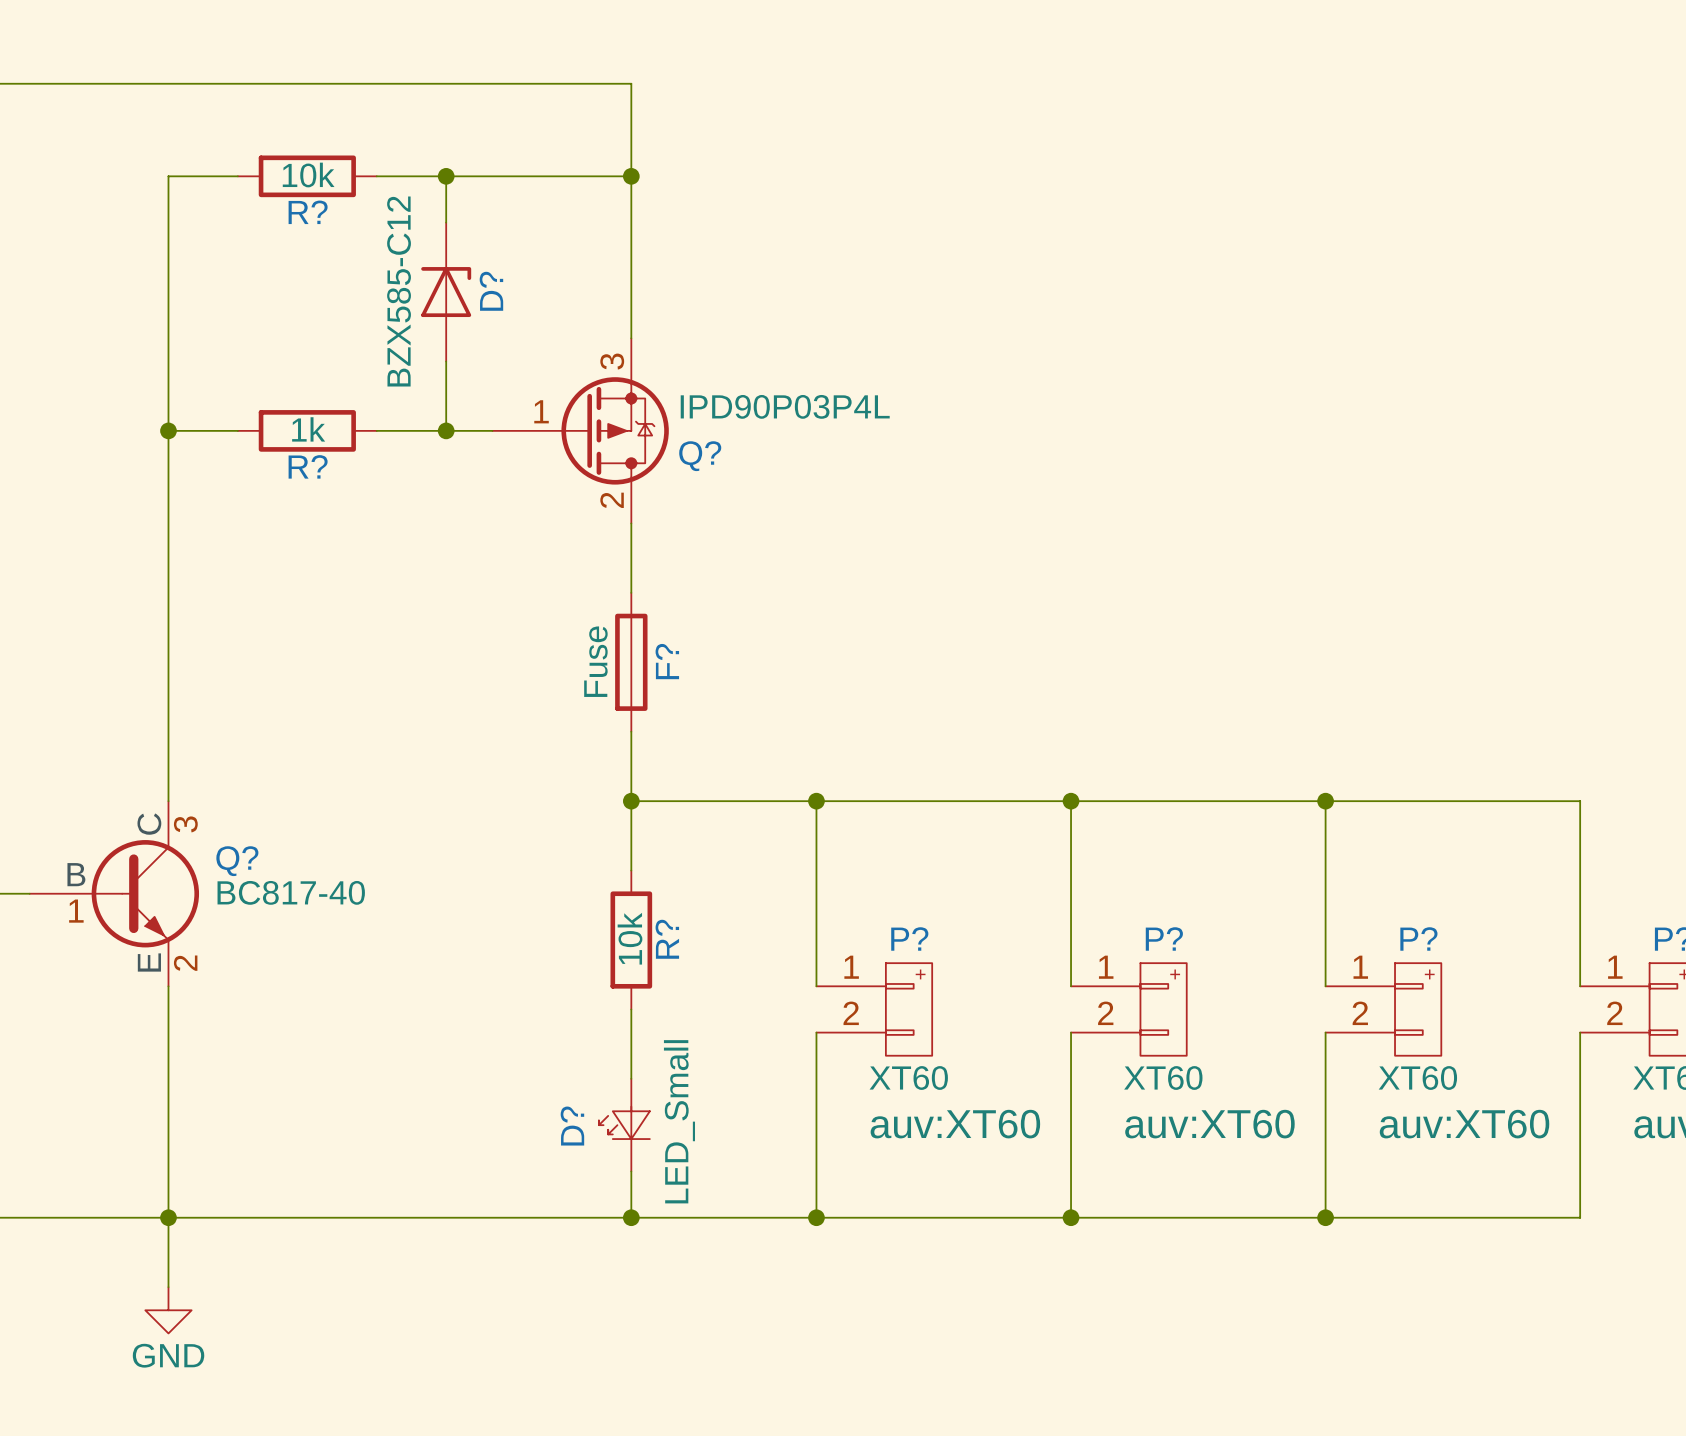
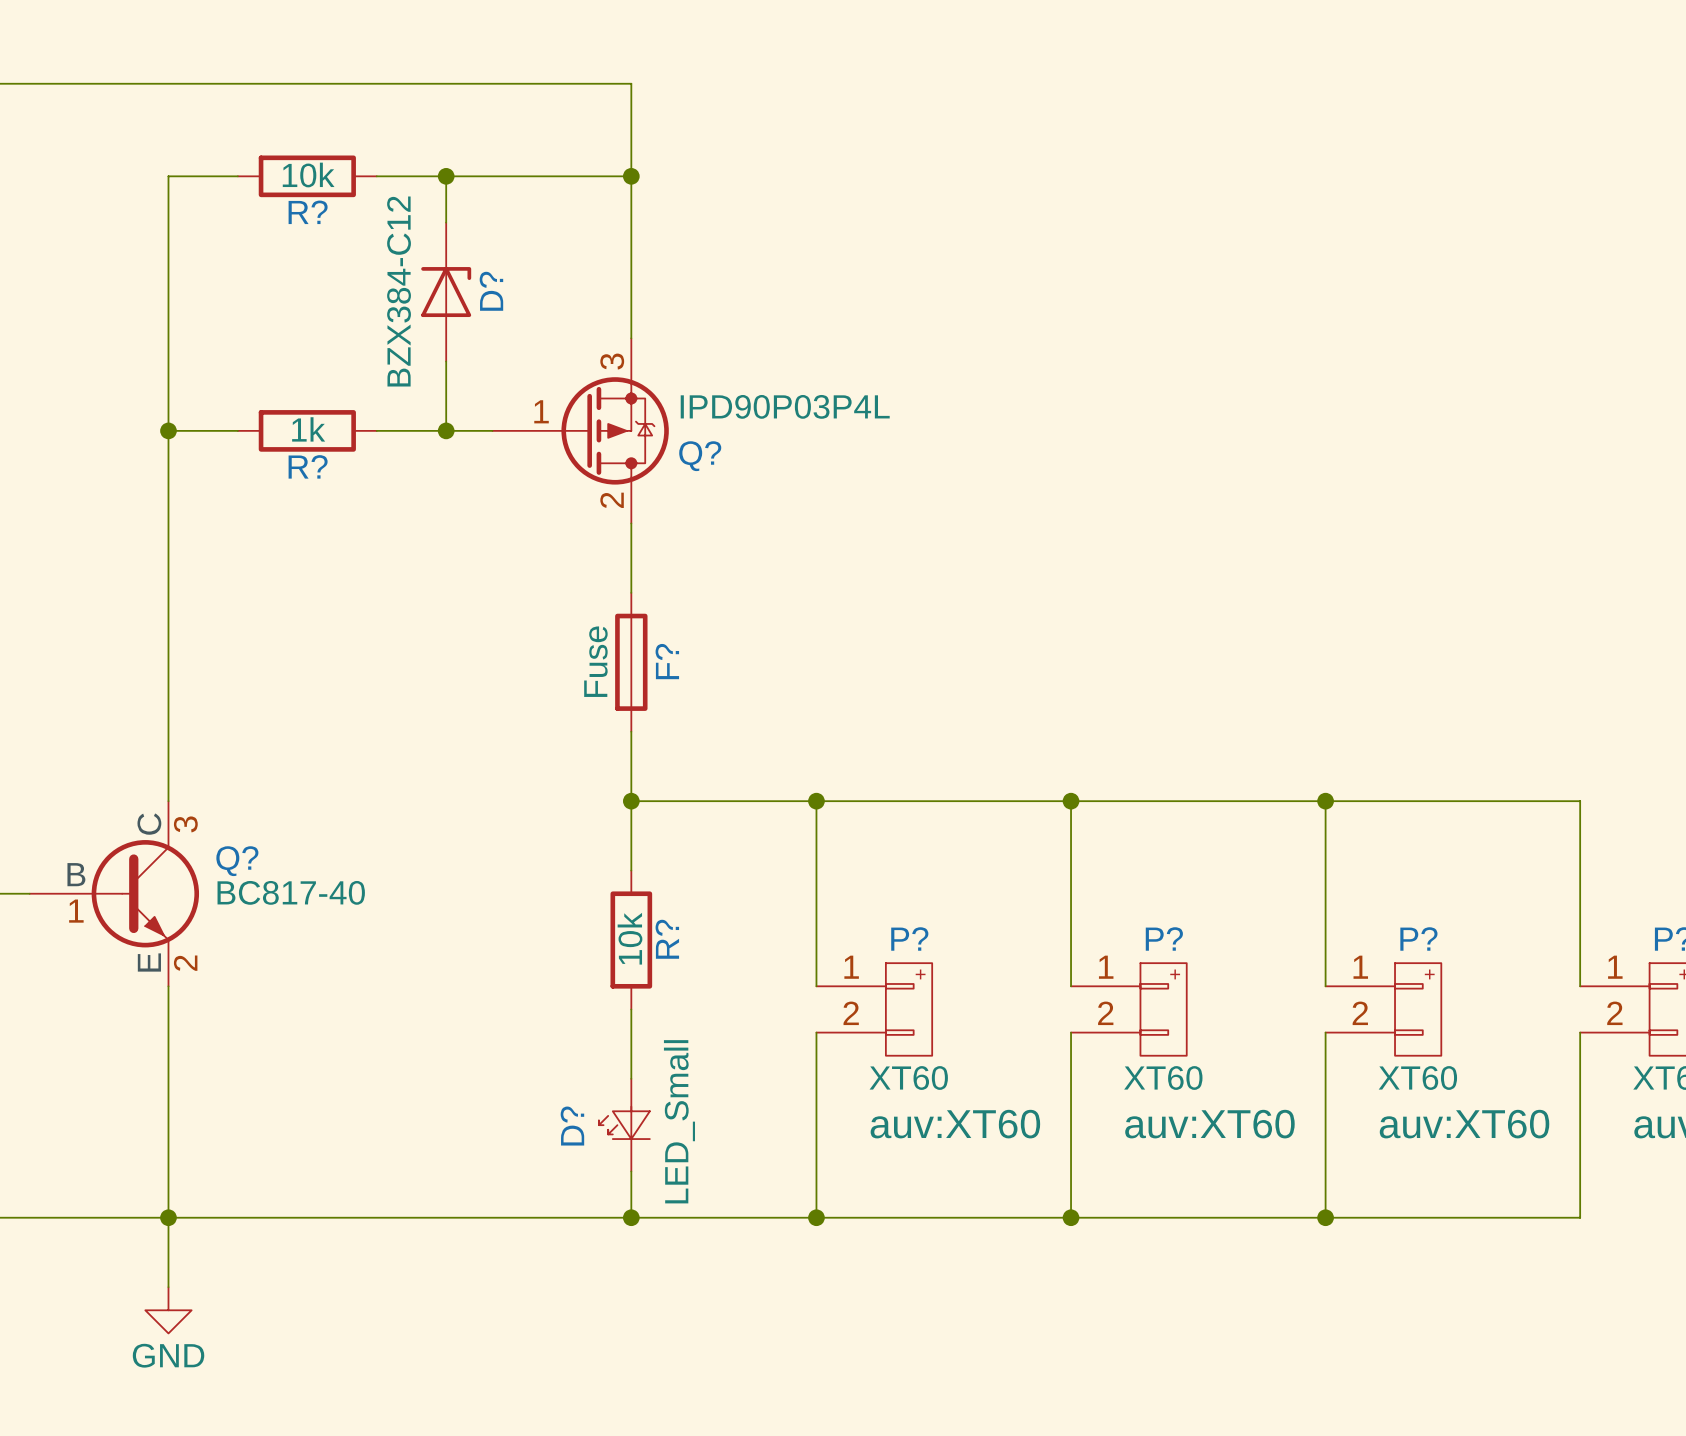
D? value: BZX585-C12 (399, 291) -> BZX384-C12 (399, 291)

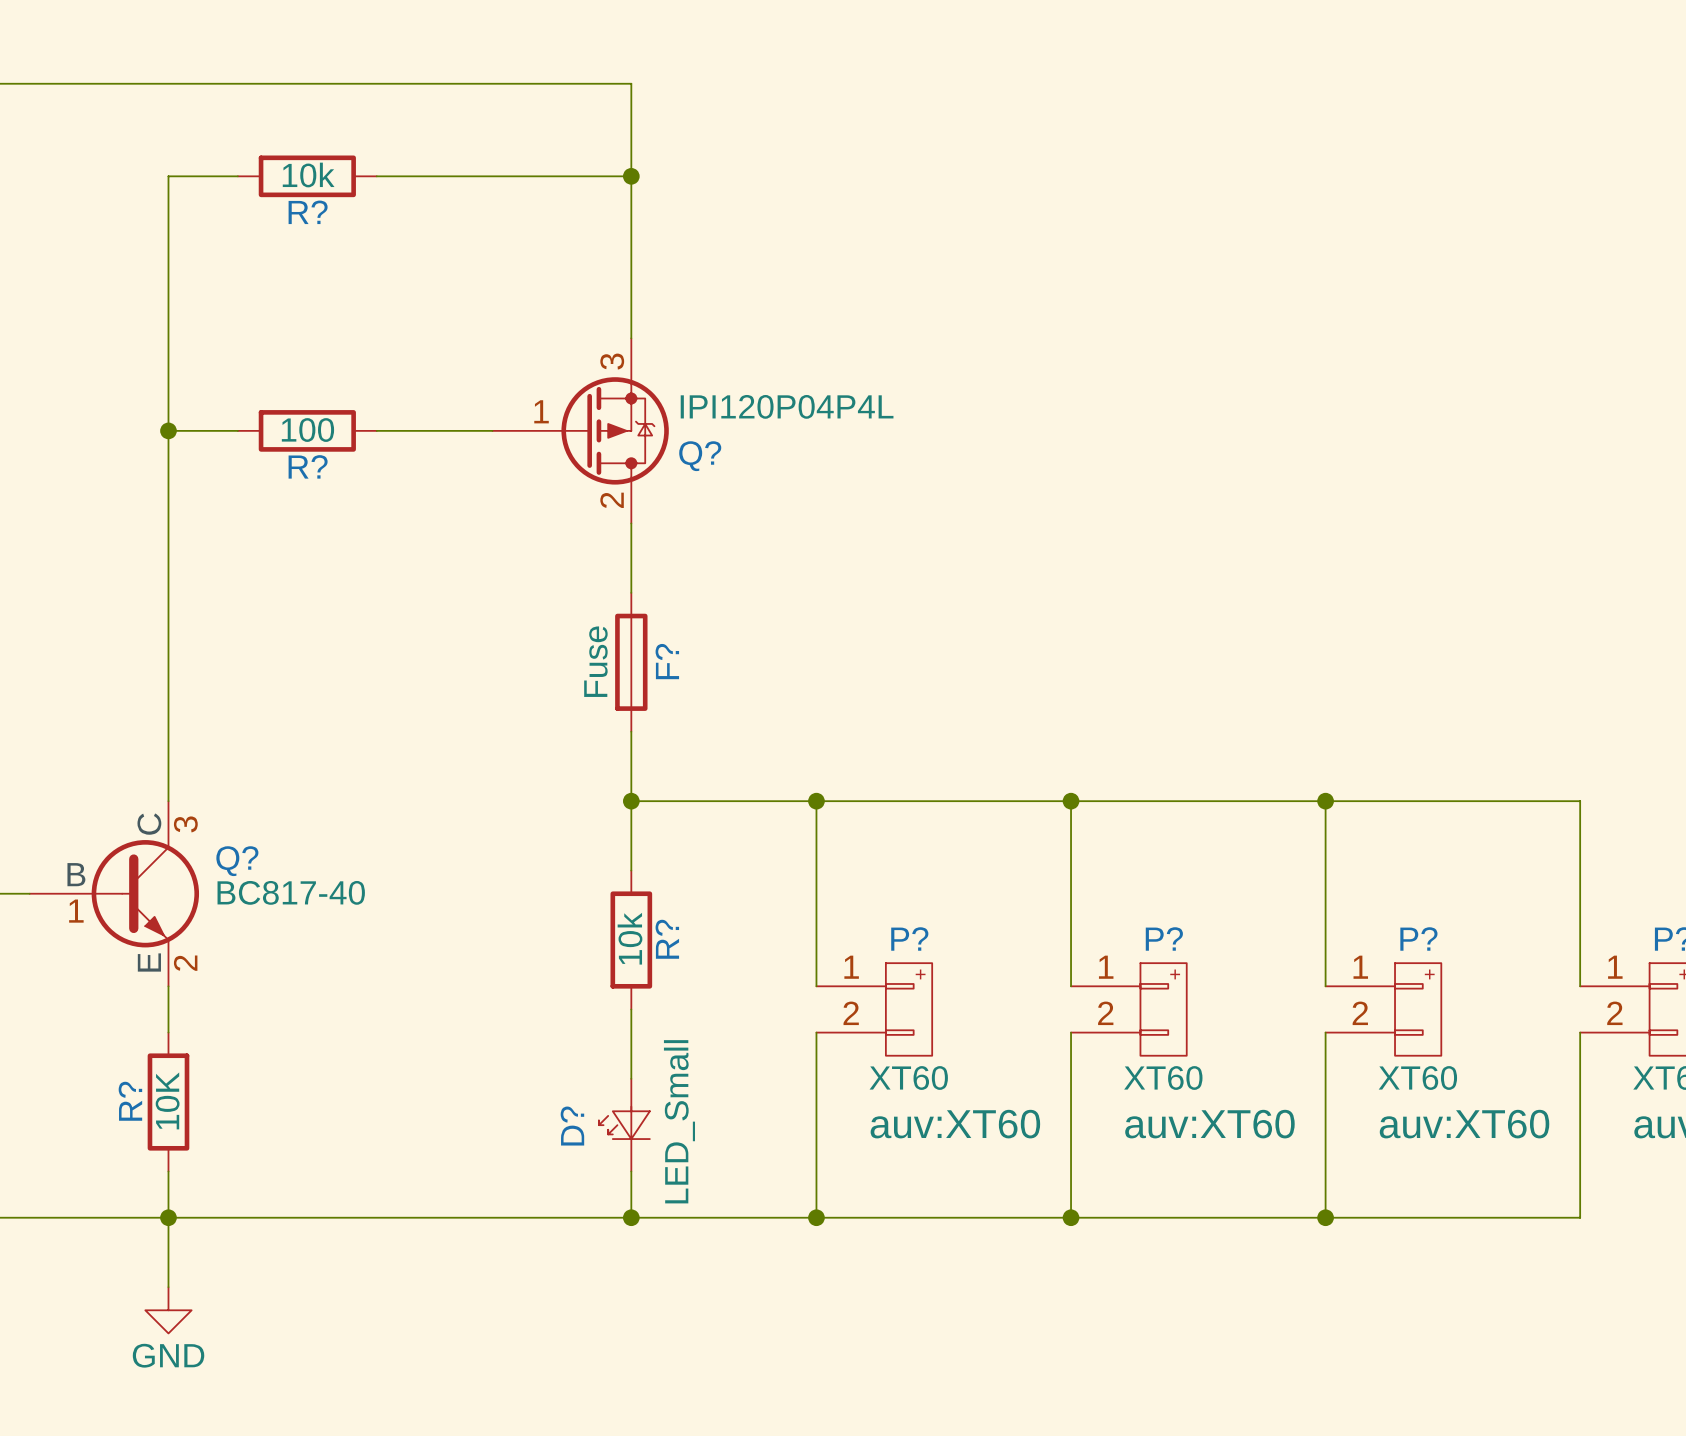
wire: (446, 176) (446, 222) -> none
junction: (446, 176) -> none
D?: BZX384-C12 (446, 292) -> none
wire: (446, 361) (446, 430) -> none
Q? value: IPD90P03P4L (785, 406) -> IPI120P04P4L (787, 406)
R? value: 1k (308, 429) -> 100 (307, 430)
junction: (446, 430) -> none
wire: (168, 1032) (168, 1171) -> none
R?: none -> 10K (168, 1102)

